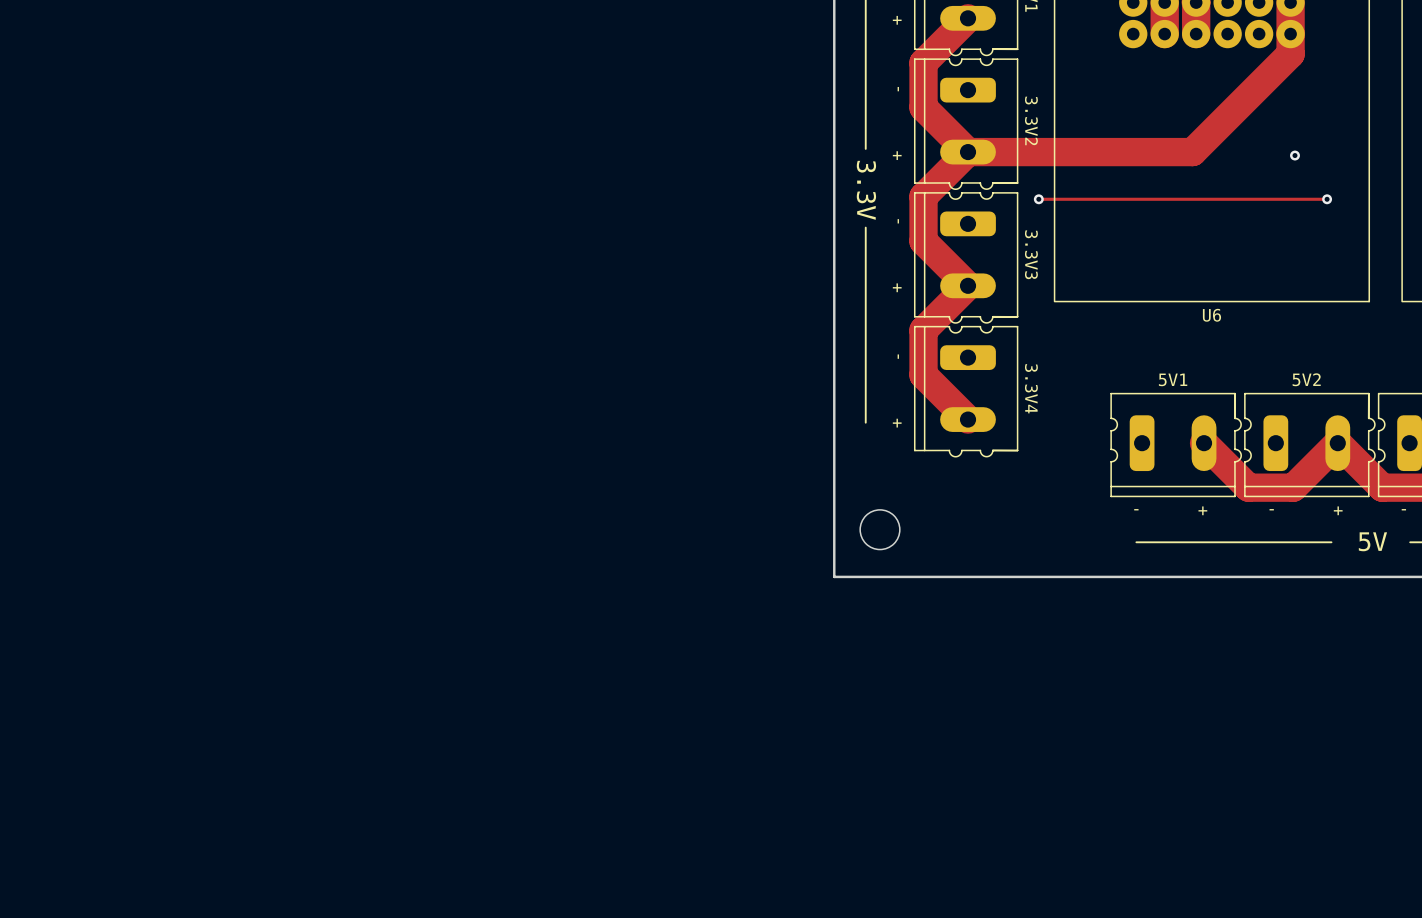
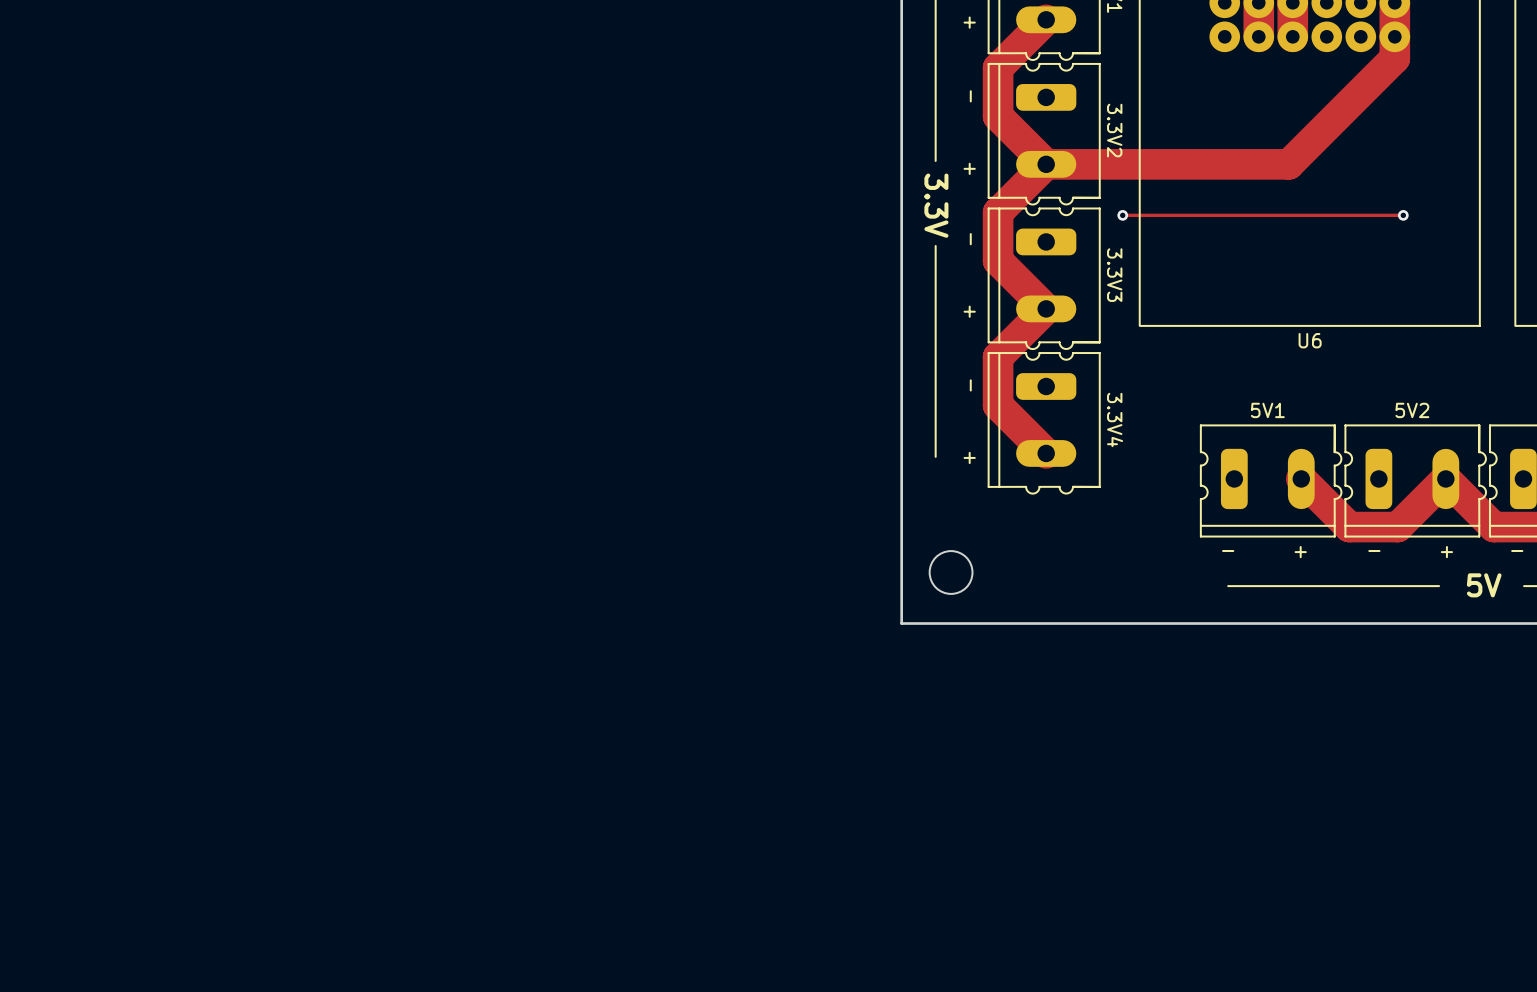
via: (1294, 155) -> none
track: (1298, 199) (1327, 199) -> none
via: none -> (1403, 215)
via: (1327, 199) -> none

